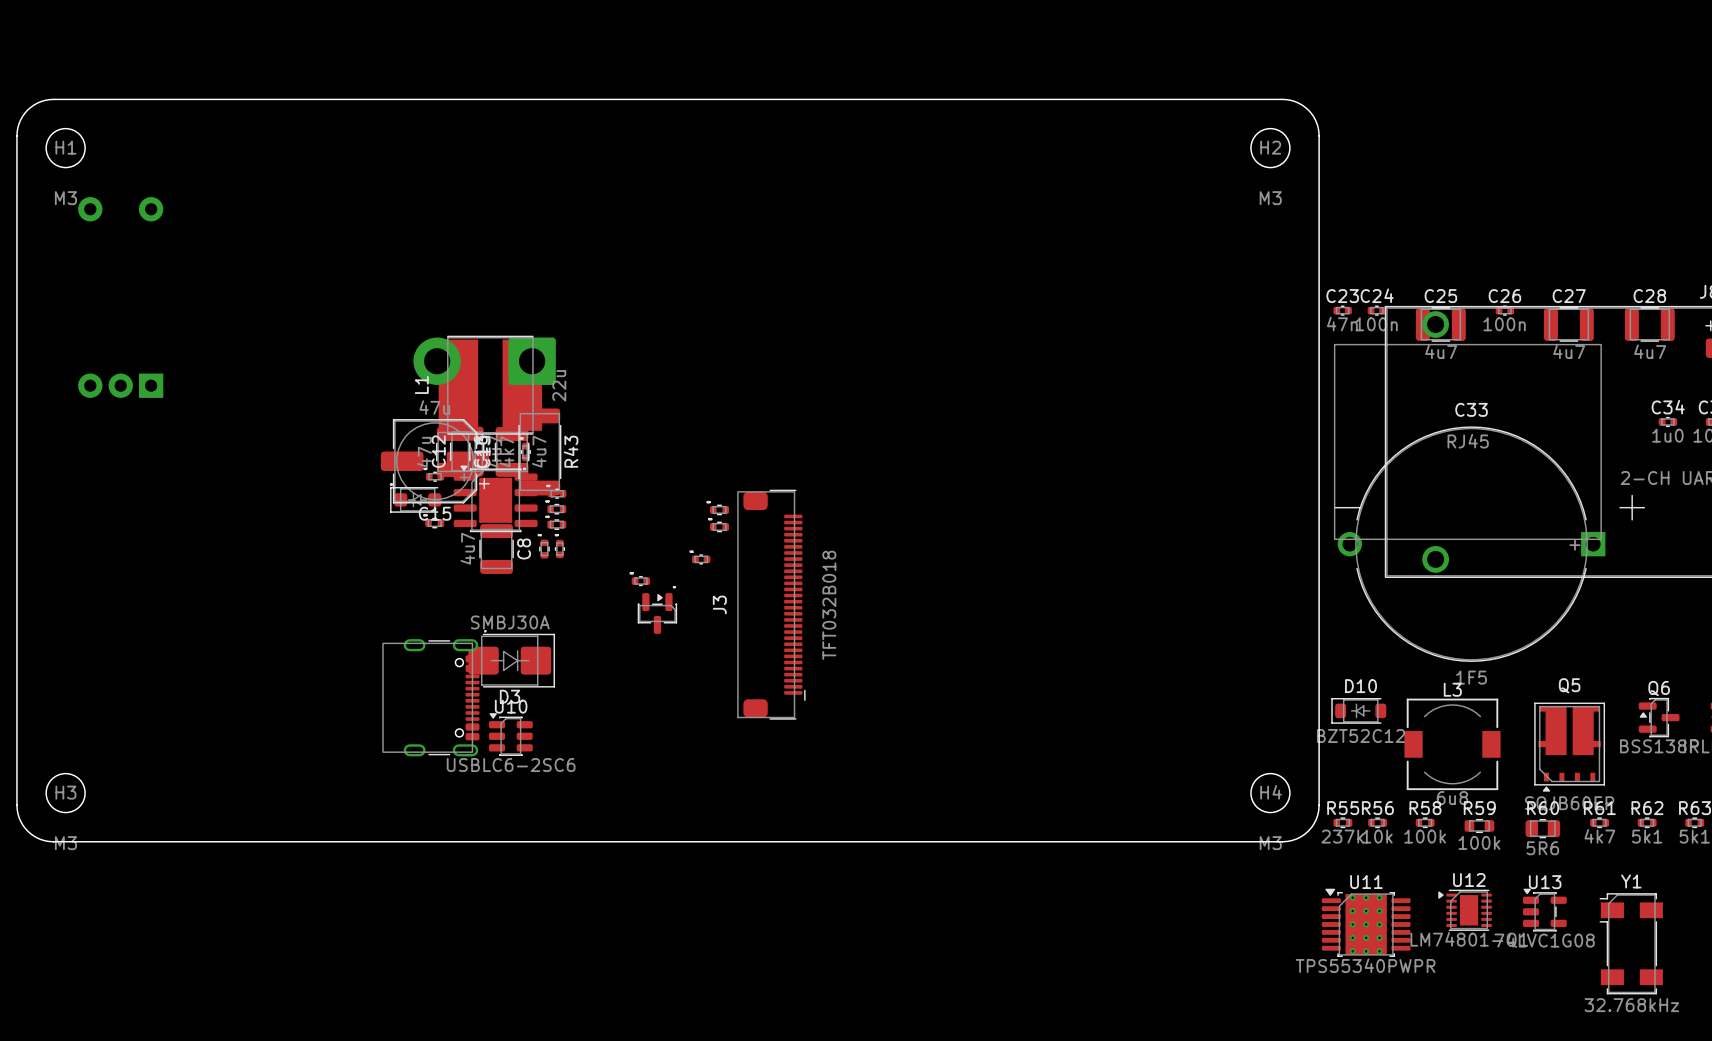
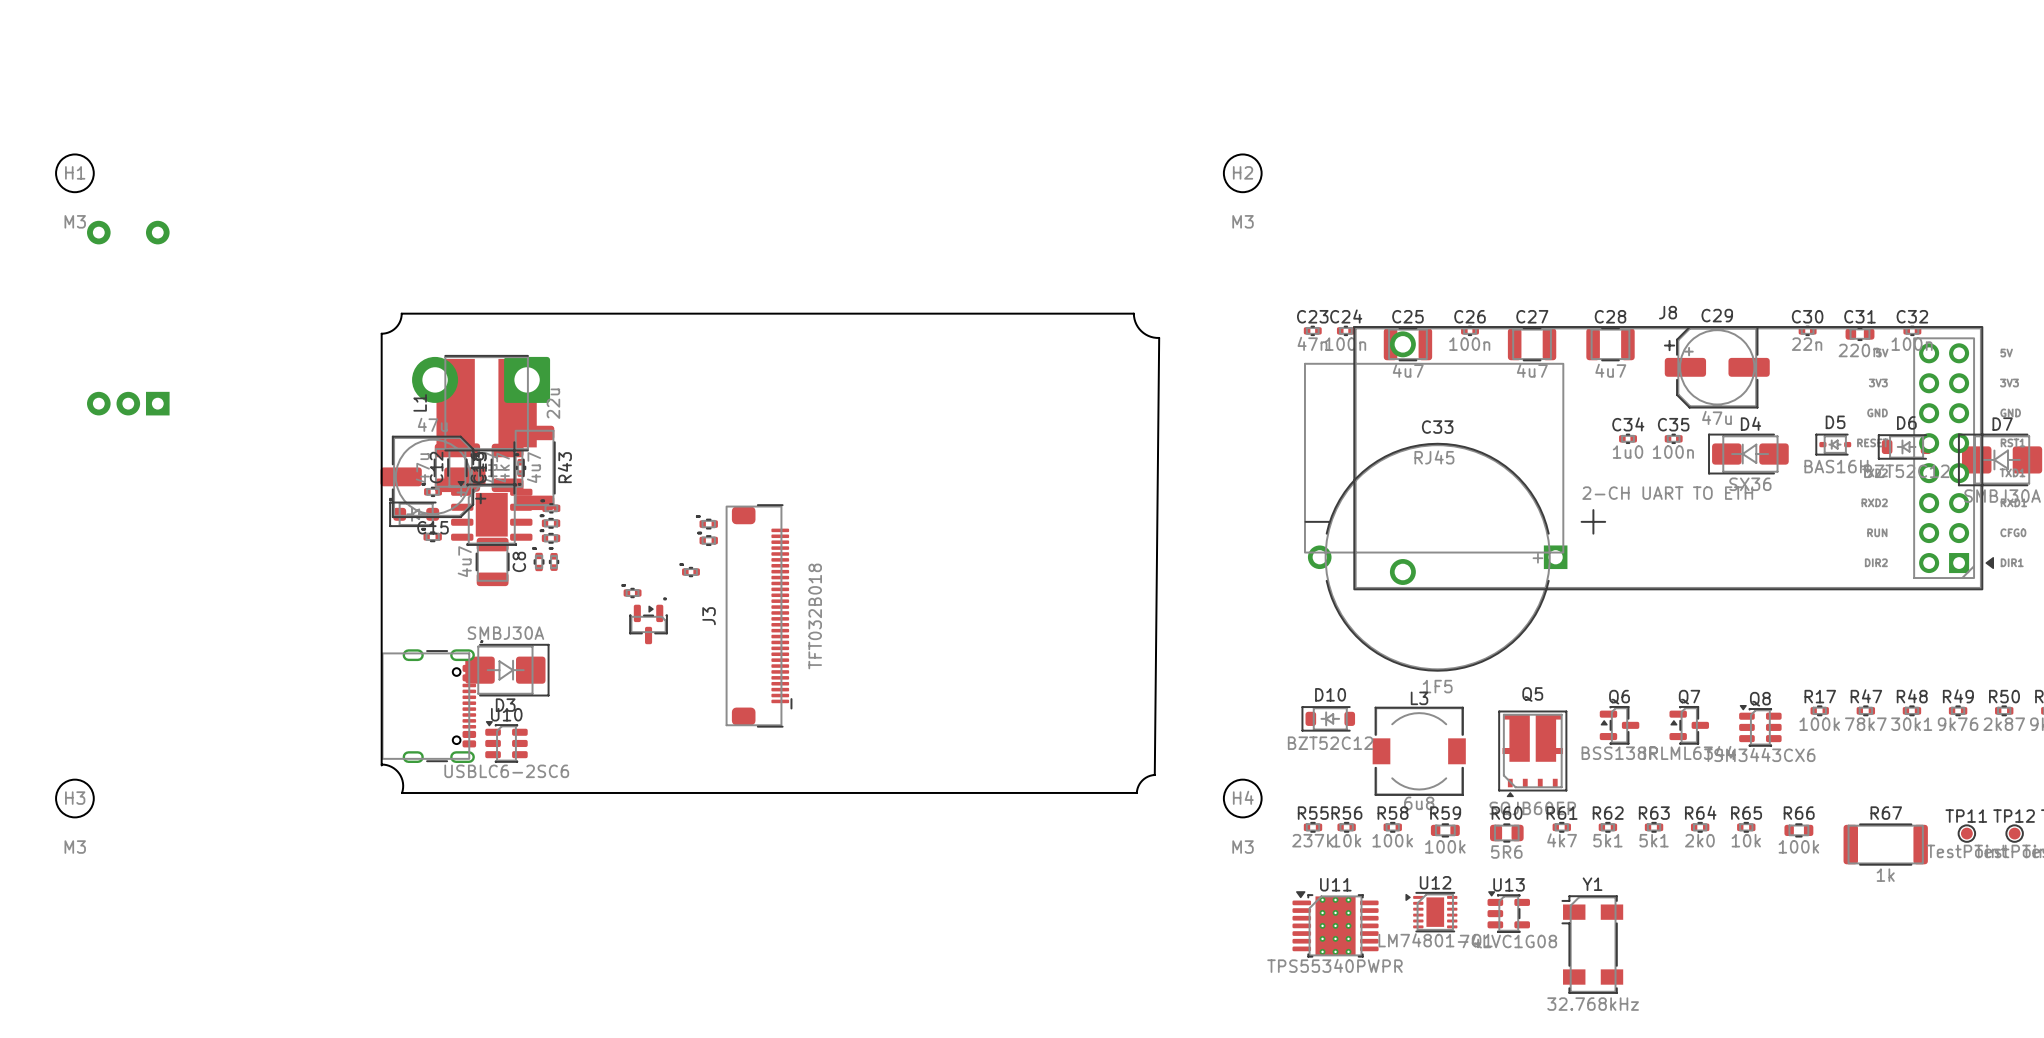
board edge: (53, 99) (1282, 99) (1302, 105) (1313, 116) (1319, 135) (1319, 805) (1314, 823) (1300, 836) (1282, 841) (53, 841) (34, 836) (22, 824) (16, 805) (16, 135) (19, 123) (27, 110) (41, 101) (53, 99) -> none
board edge: none -> (381, 764) (391, 766) (399, 773) (402, 782) (402, 793) (1136, 792) (1142, 780) (1154, 774)
board edge: none -> (381, 765) (381, 333) (395, 327) (401, 313) (1133, 313) (1136, 324) (1141, 331) (1148, 335) (1159, 337) (1154, 775)

